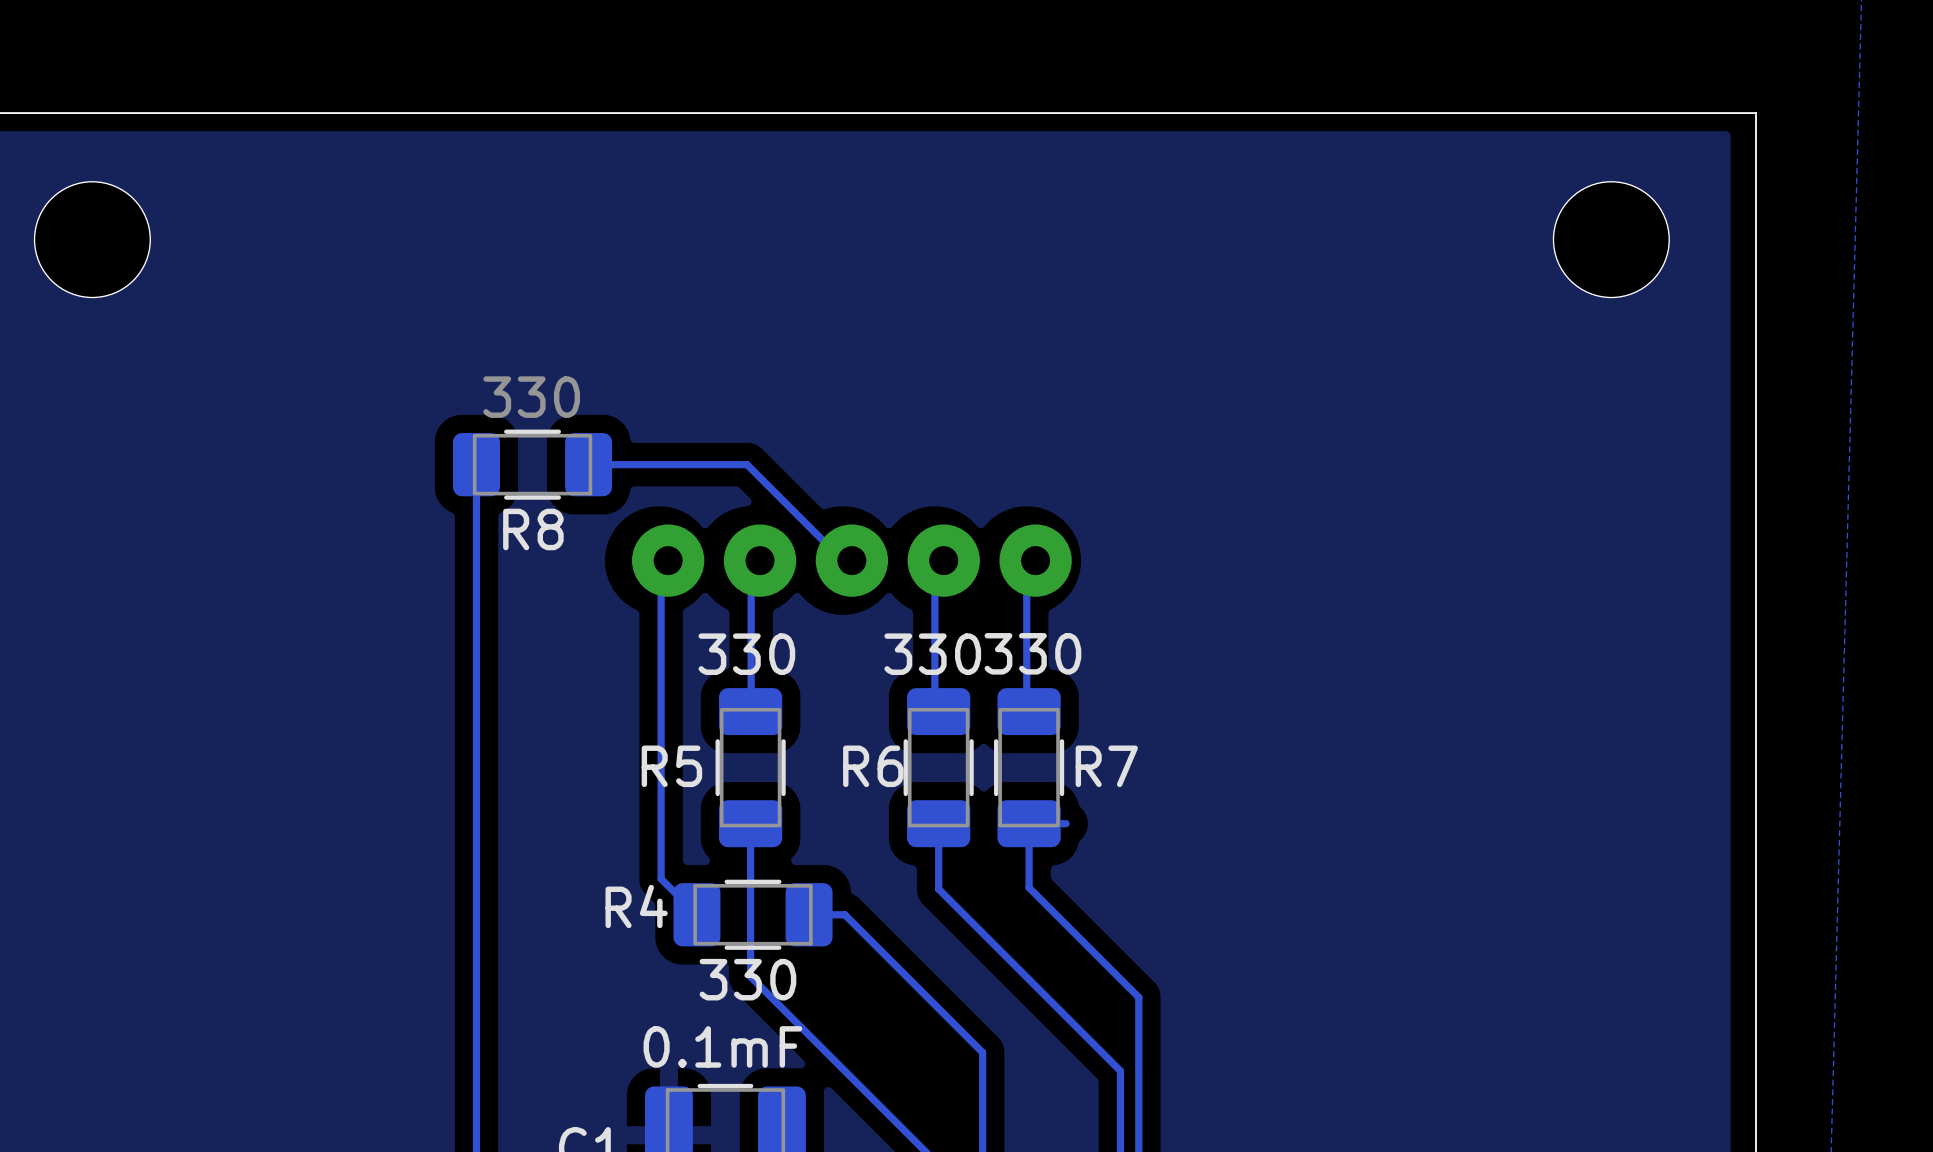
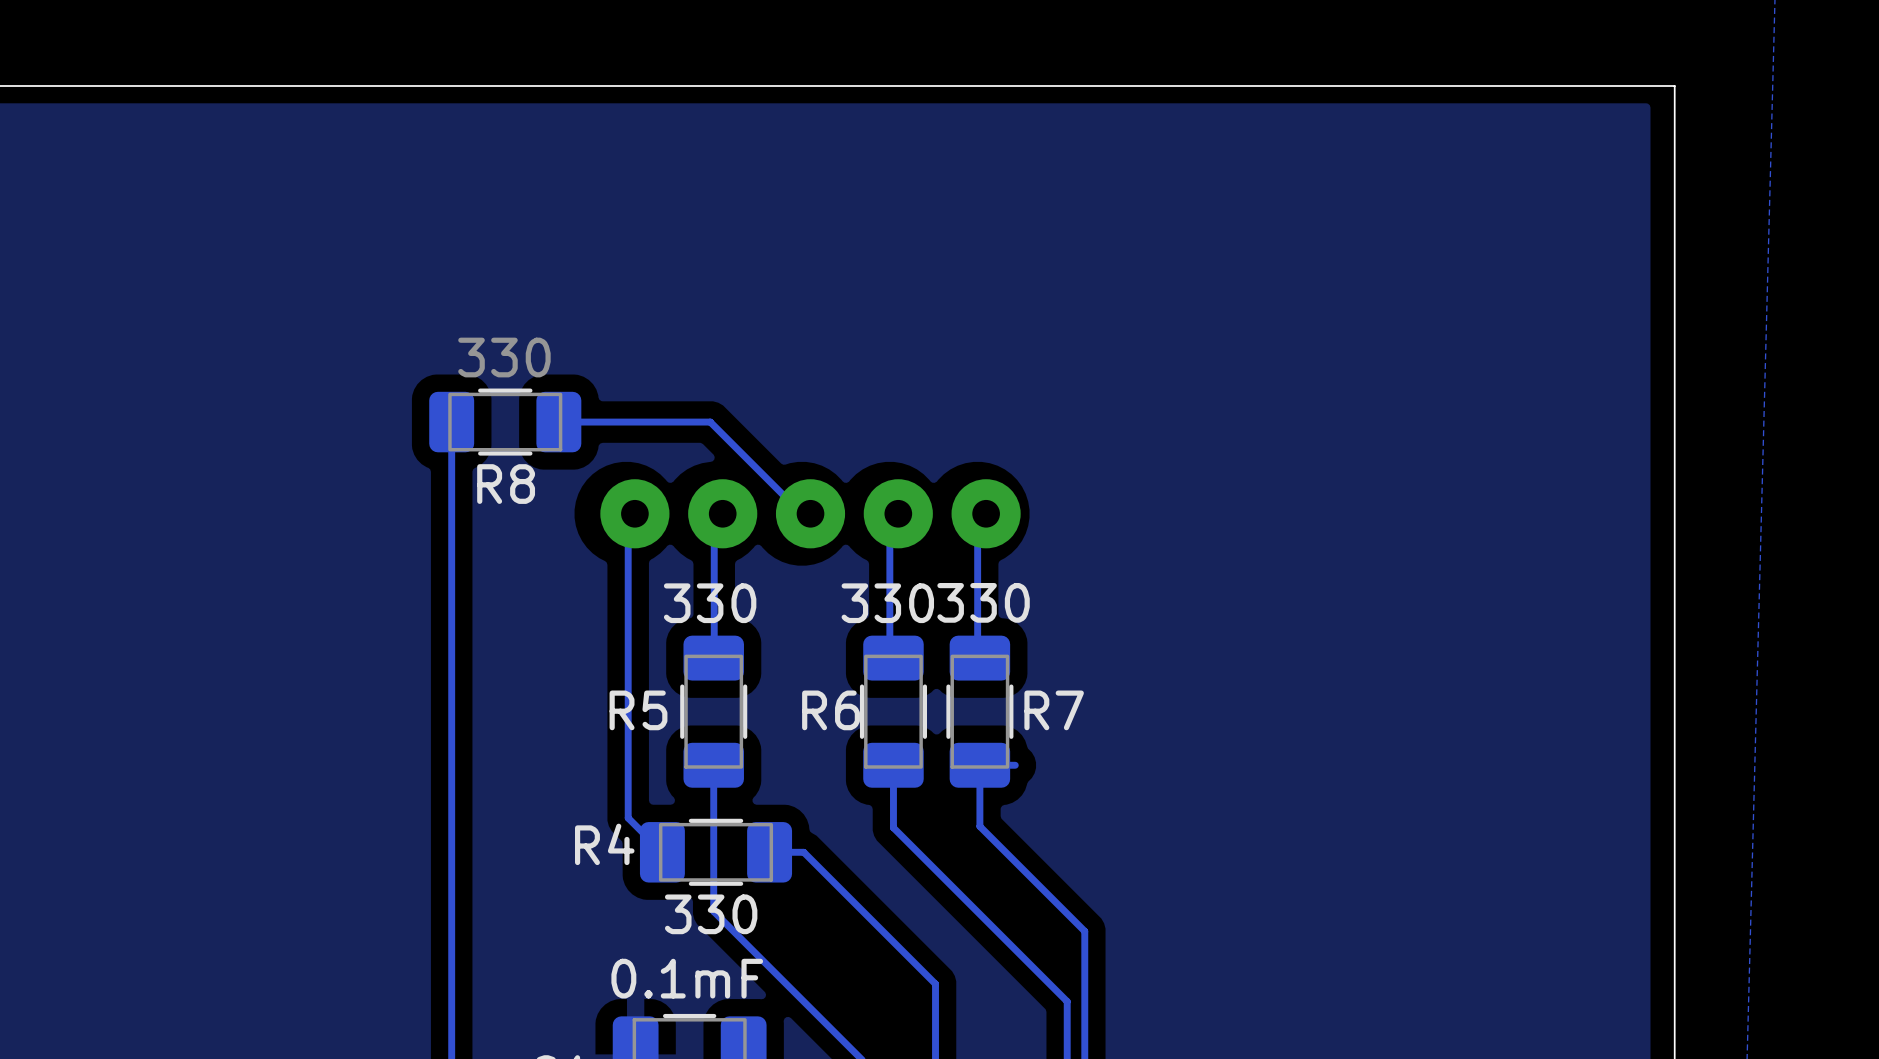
part: (92, 239) -> none
part: (1611, 239) -> none

